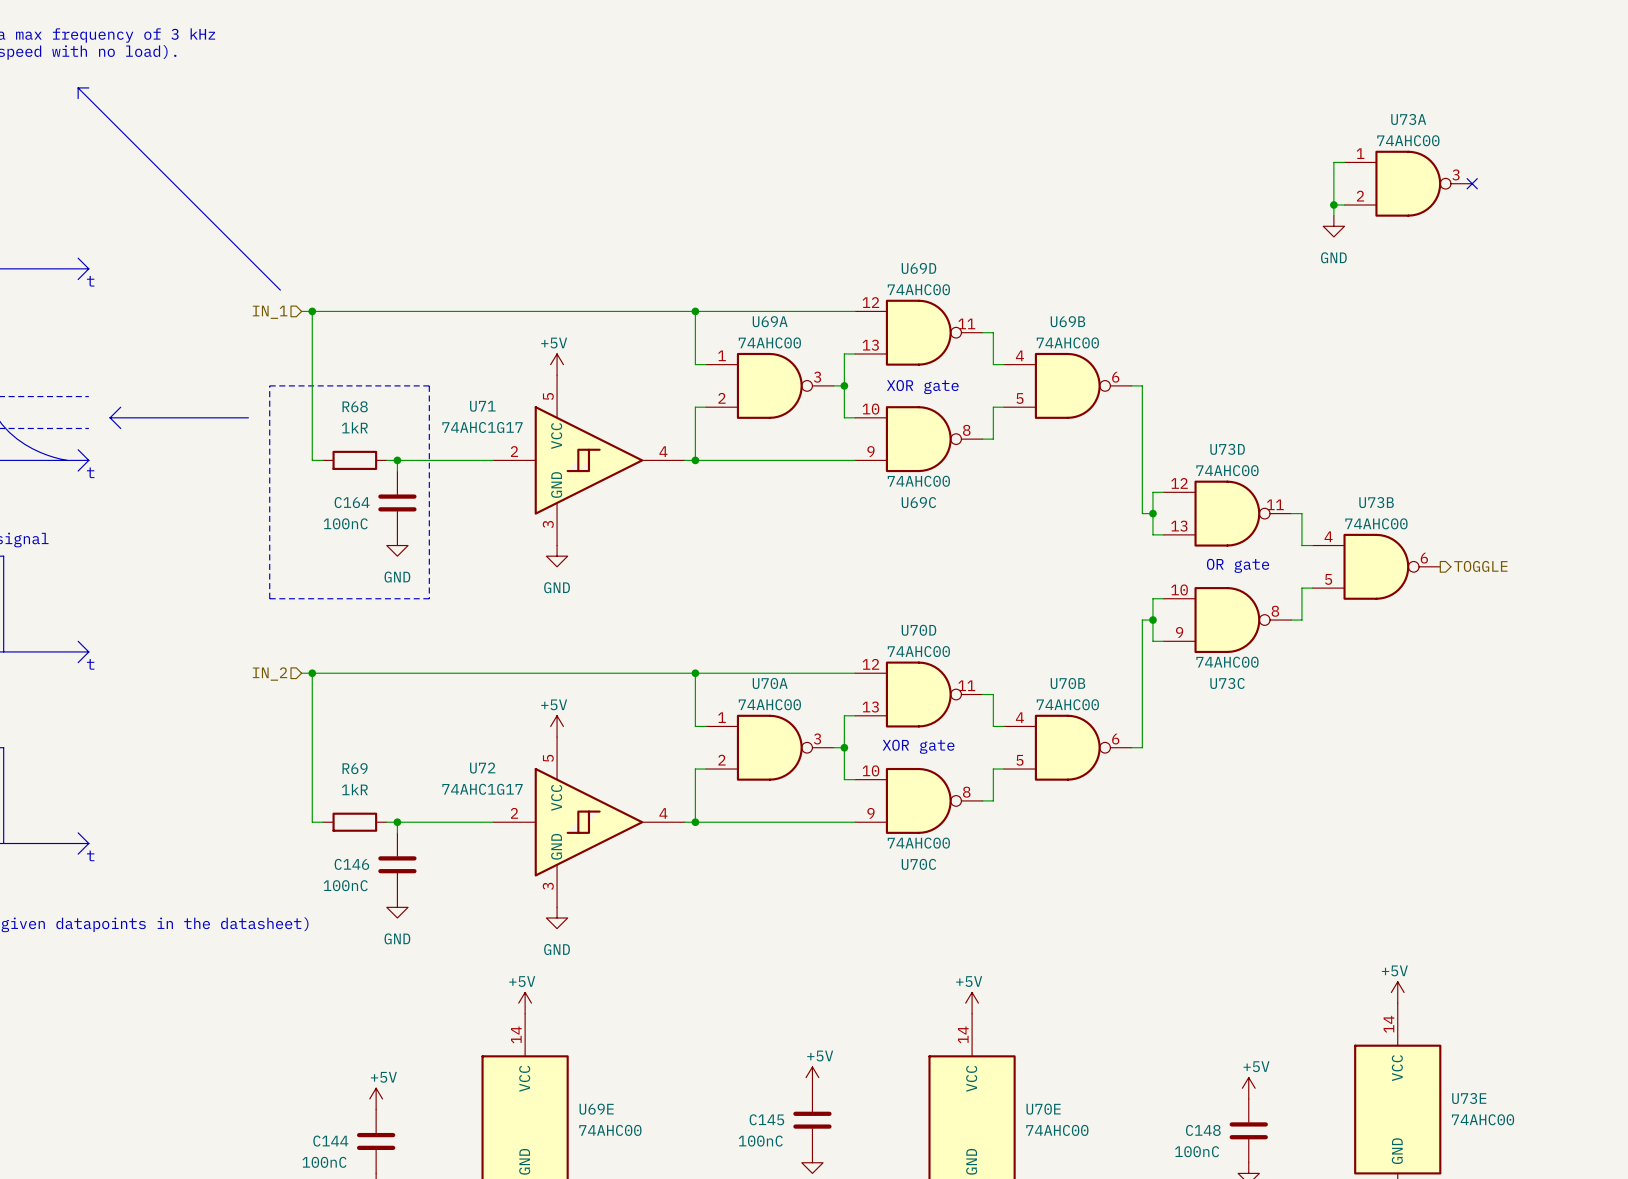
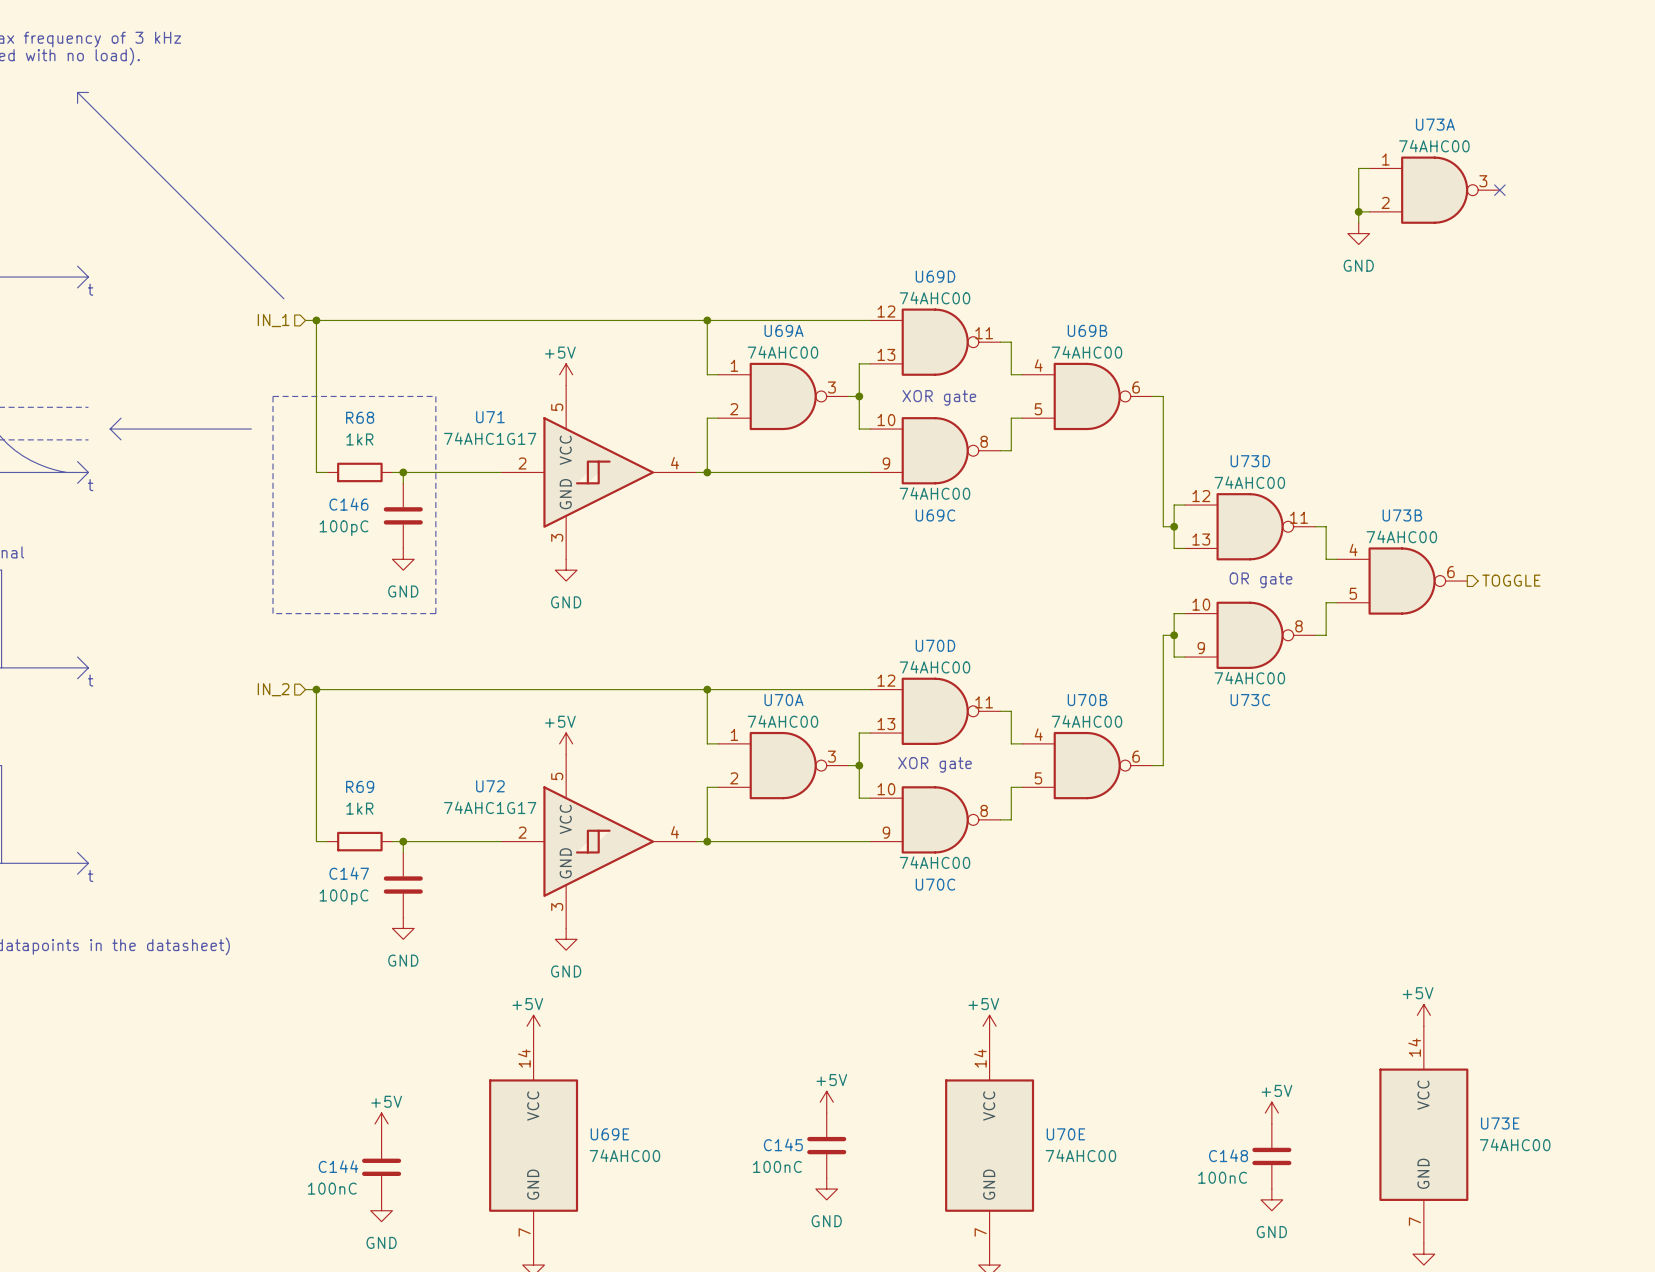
C164 name: C164 (352, 502) -> C146 (348, 504)
C164 value: 100nC (345, 523) -> 100pC (344, 528)
C146 name: C146 (351, 864) -> C147 (349, 873)
C146 value: 100nC (345, 885) -> 100pC (344, 897)

